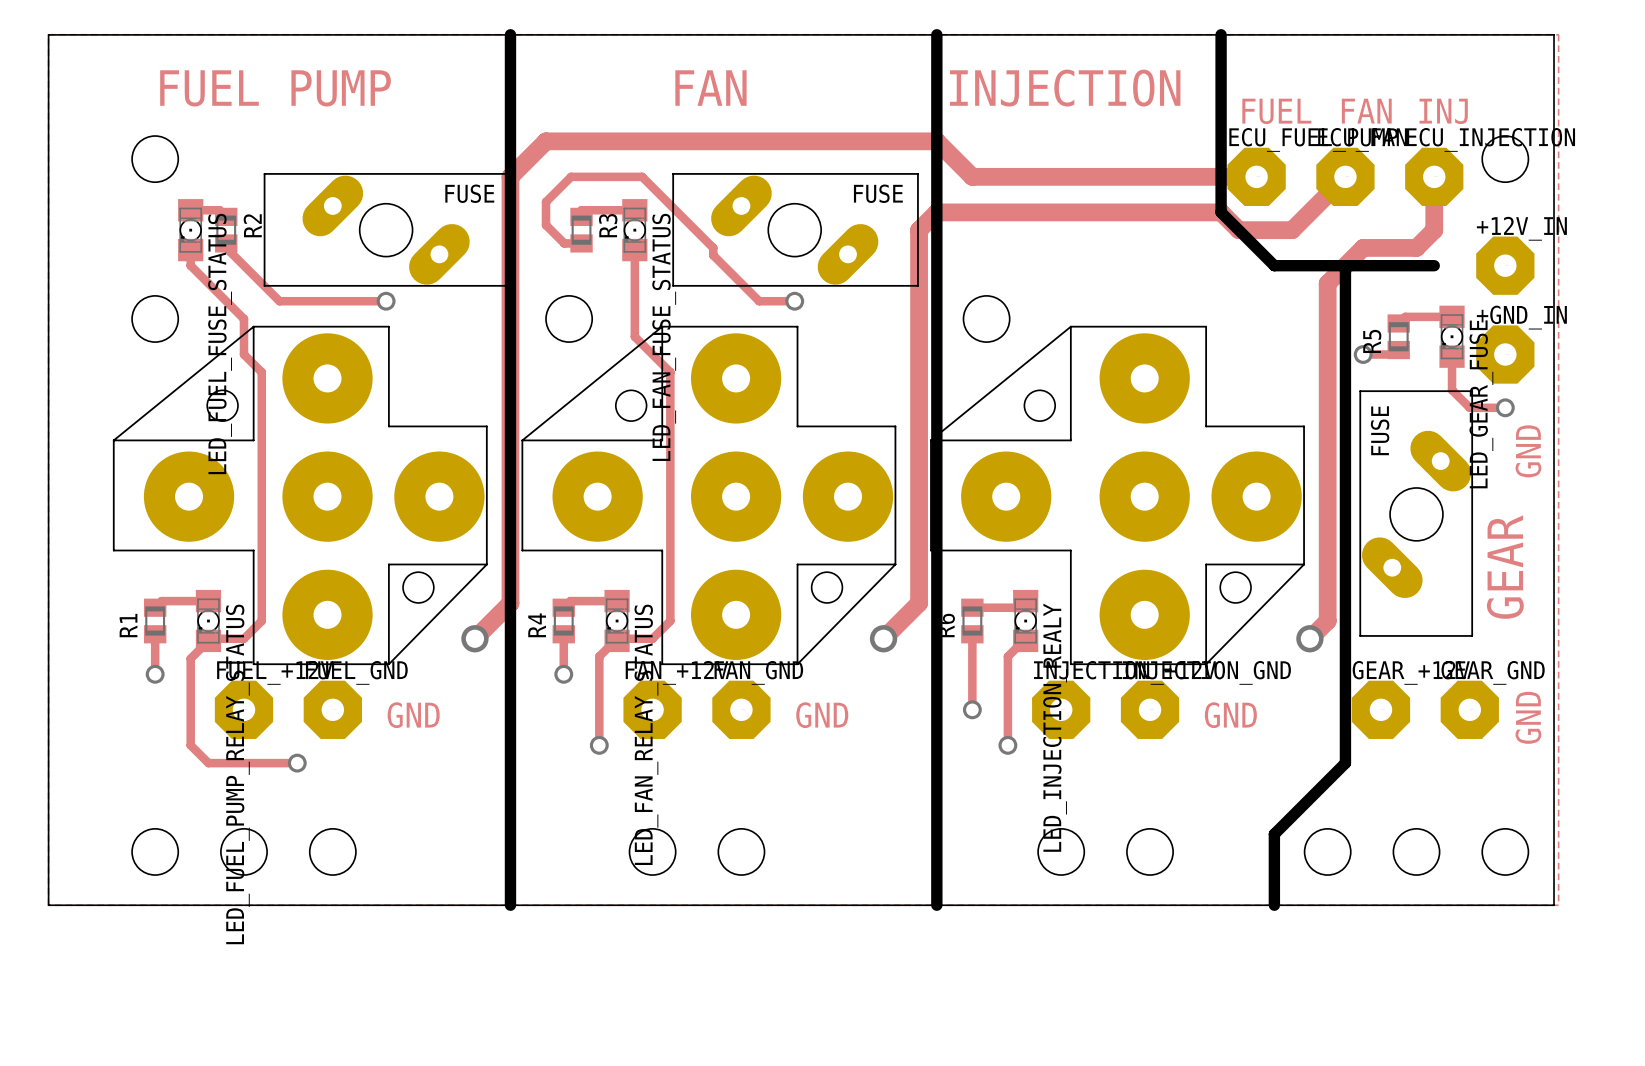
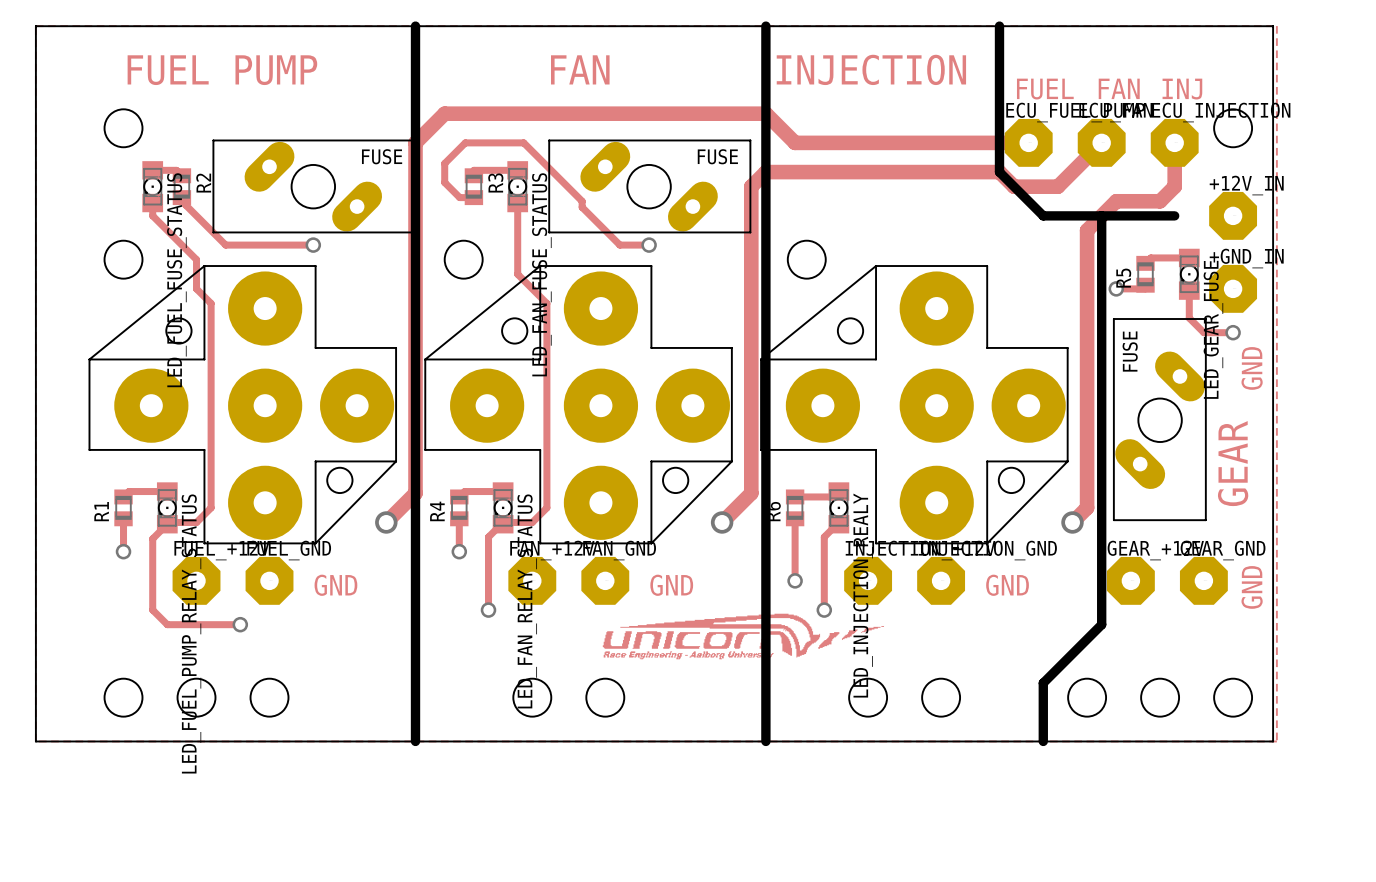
drawing: none -> [602, 613, 885, 660]

